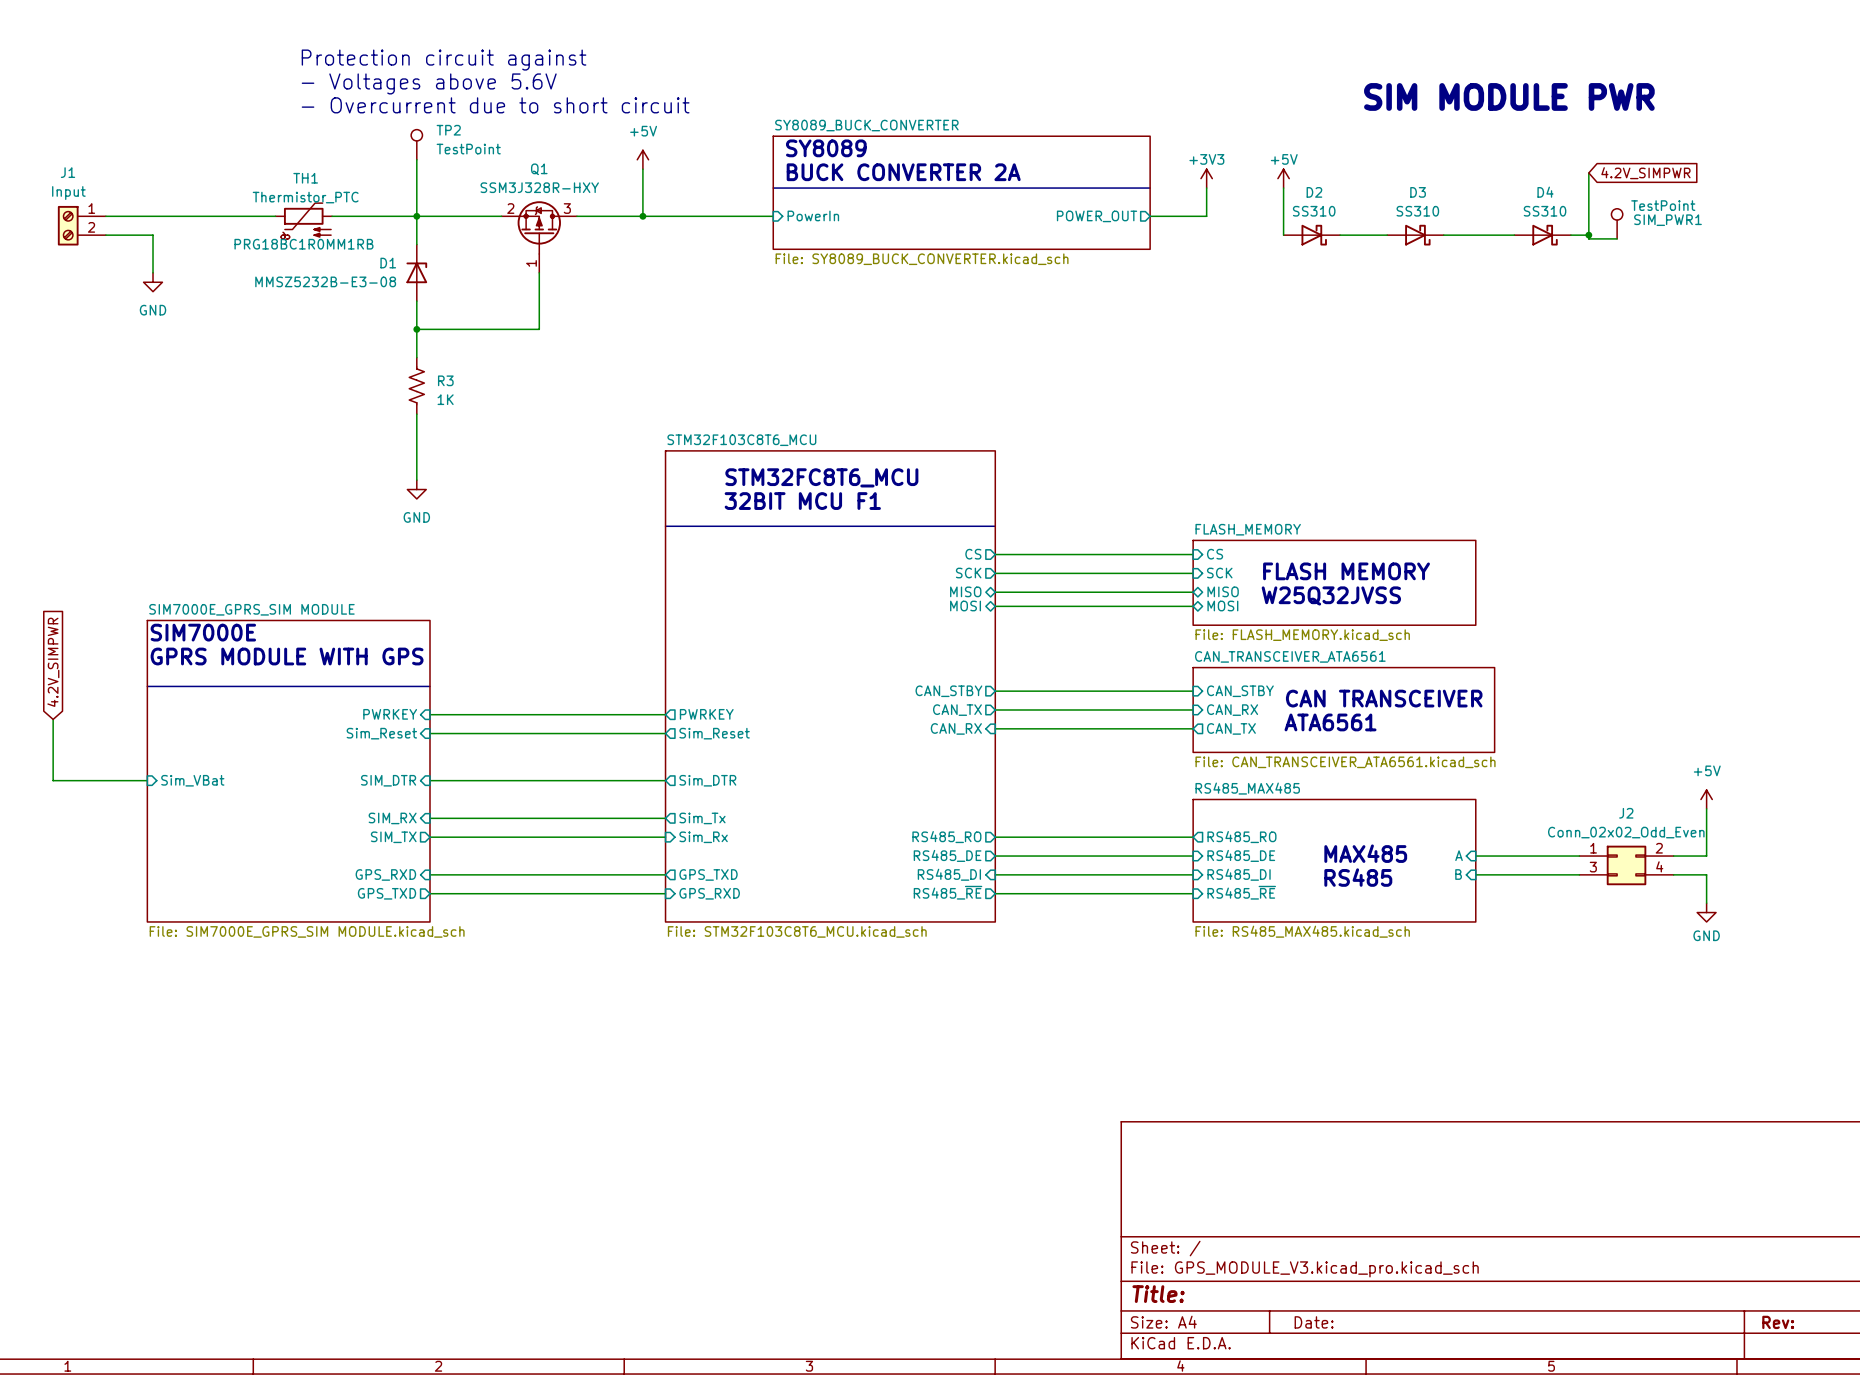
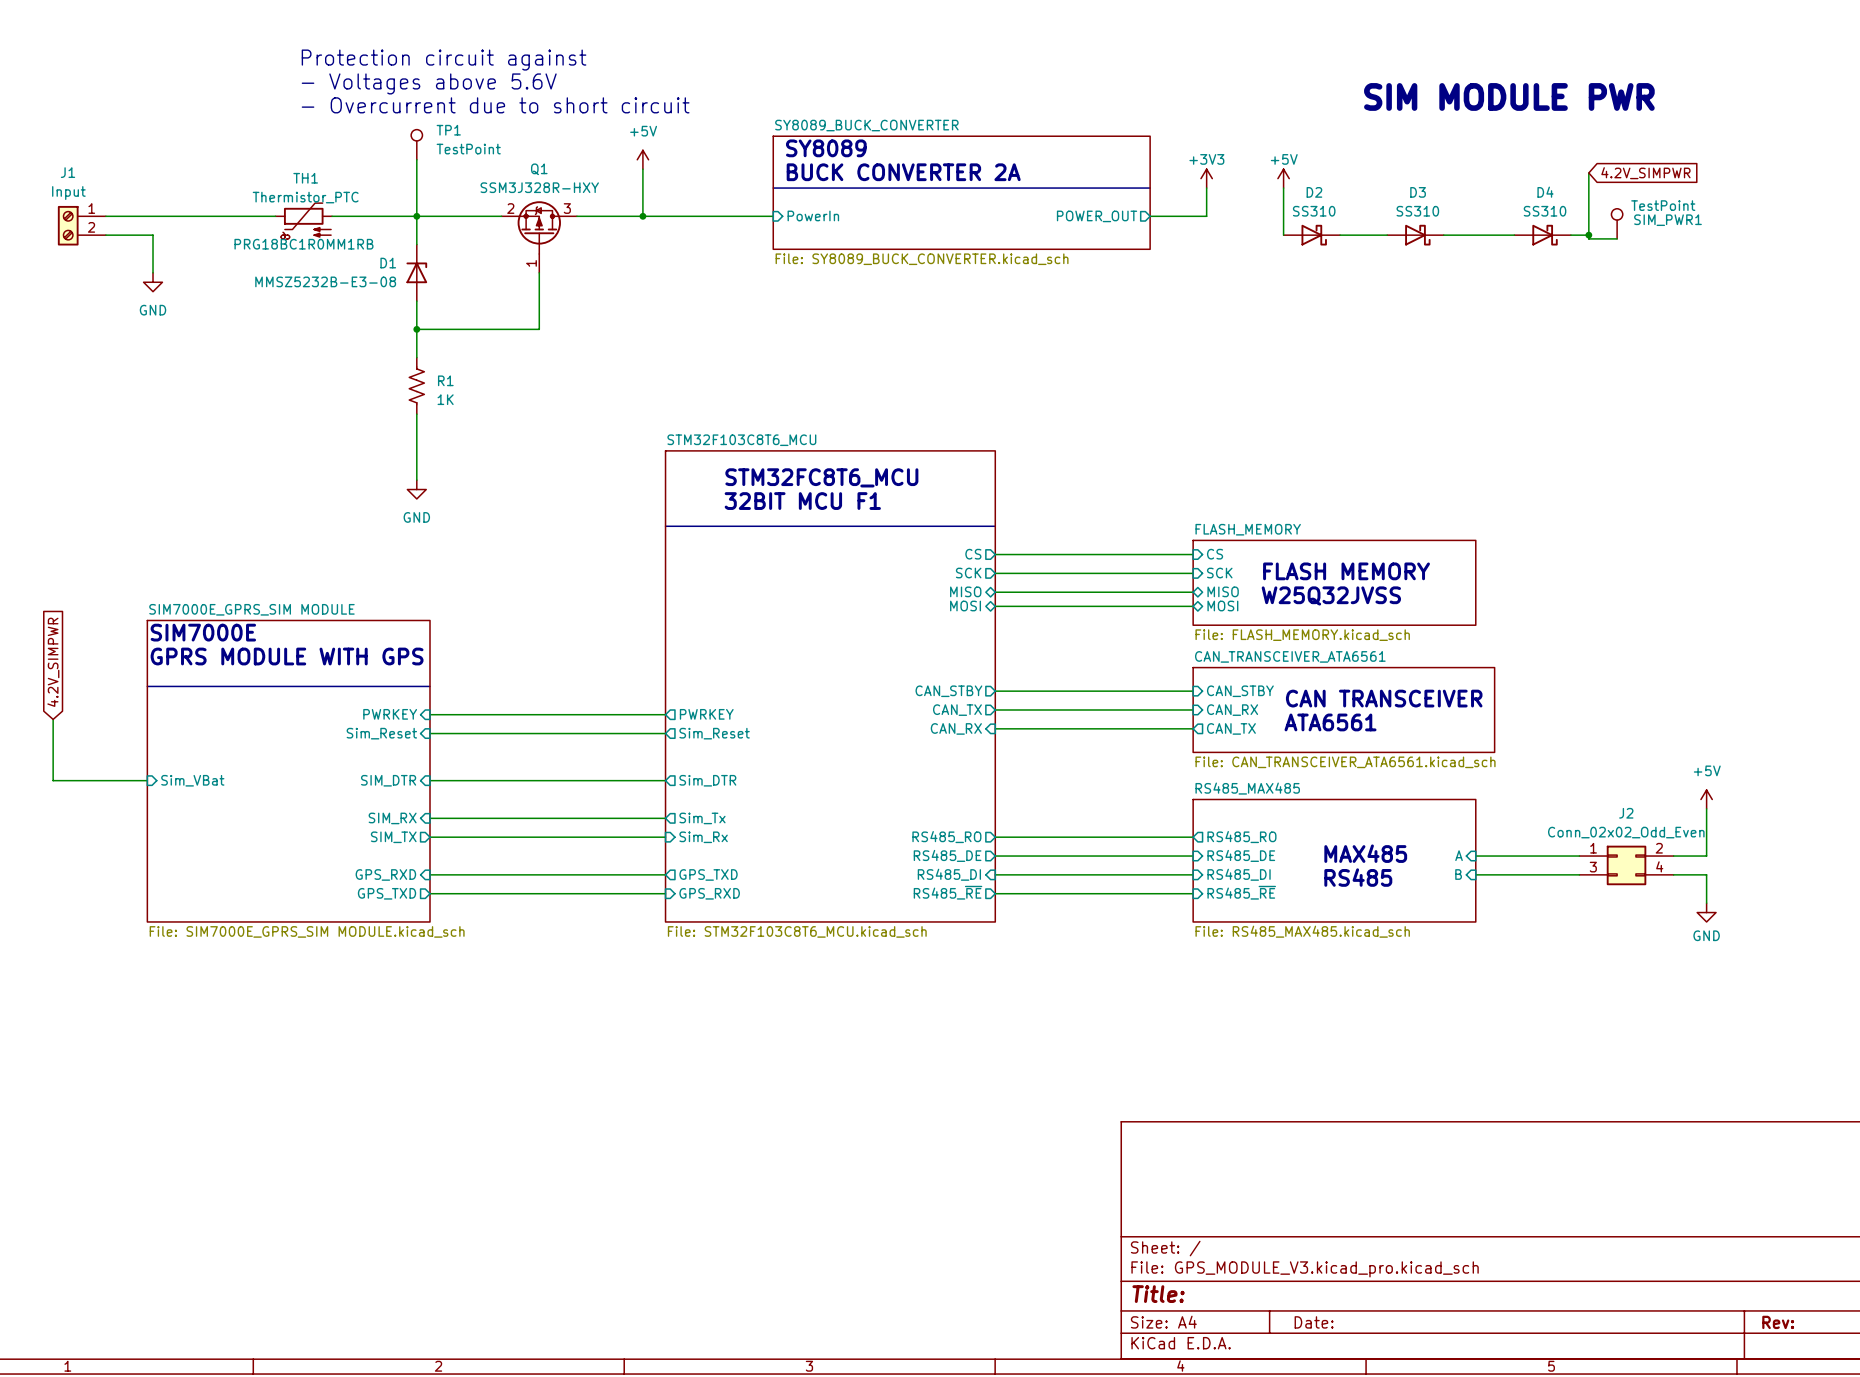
TP2 name: TP2 (448, 130) -> TP1 (448, 130)
R3 name: R3 (445, 380) -> R1 (445, 380)

